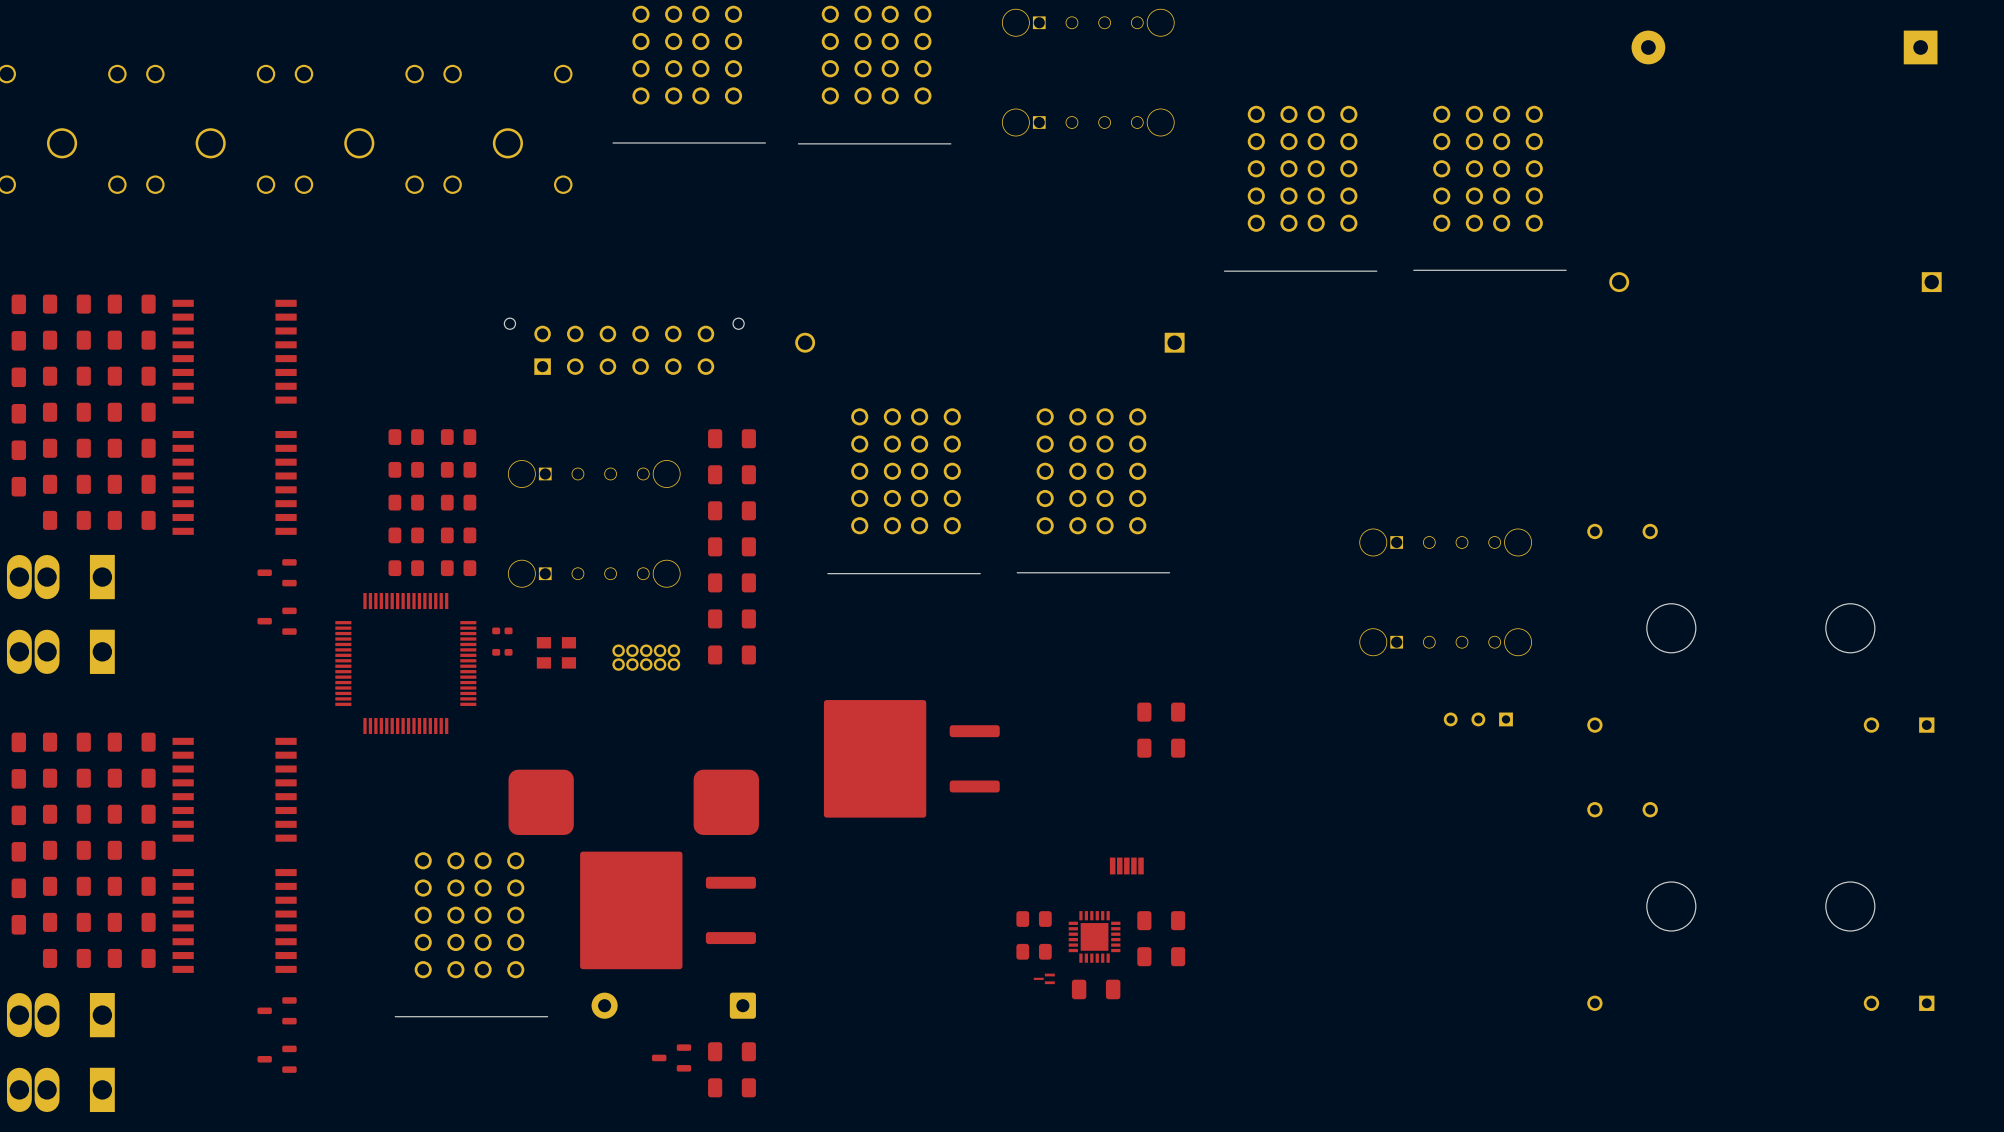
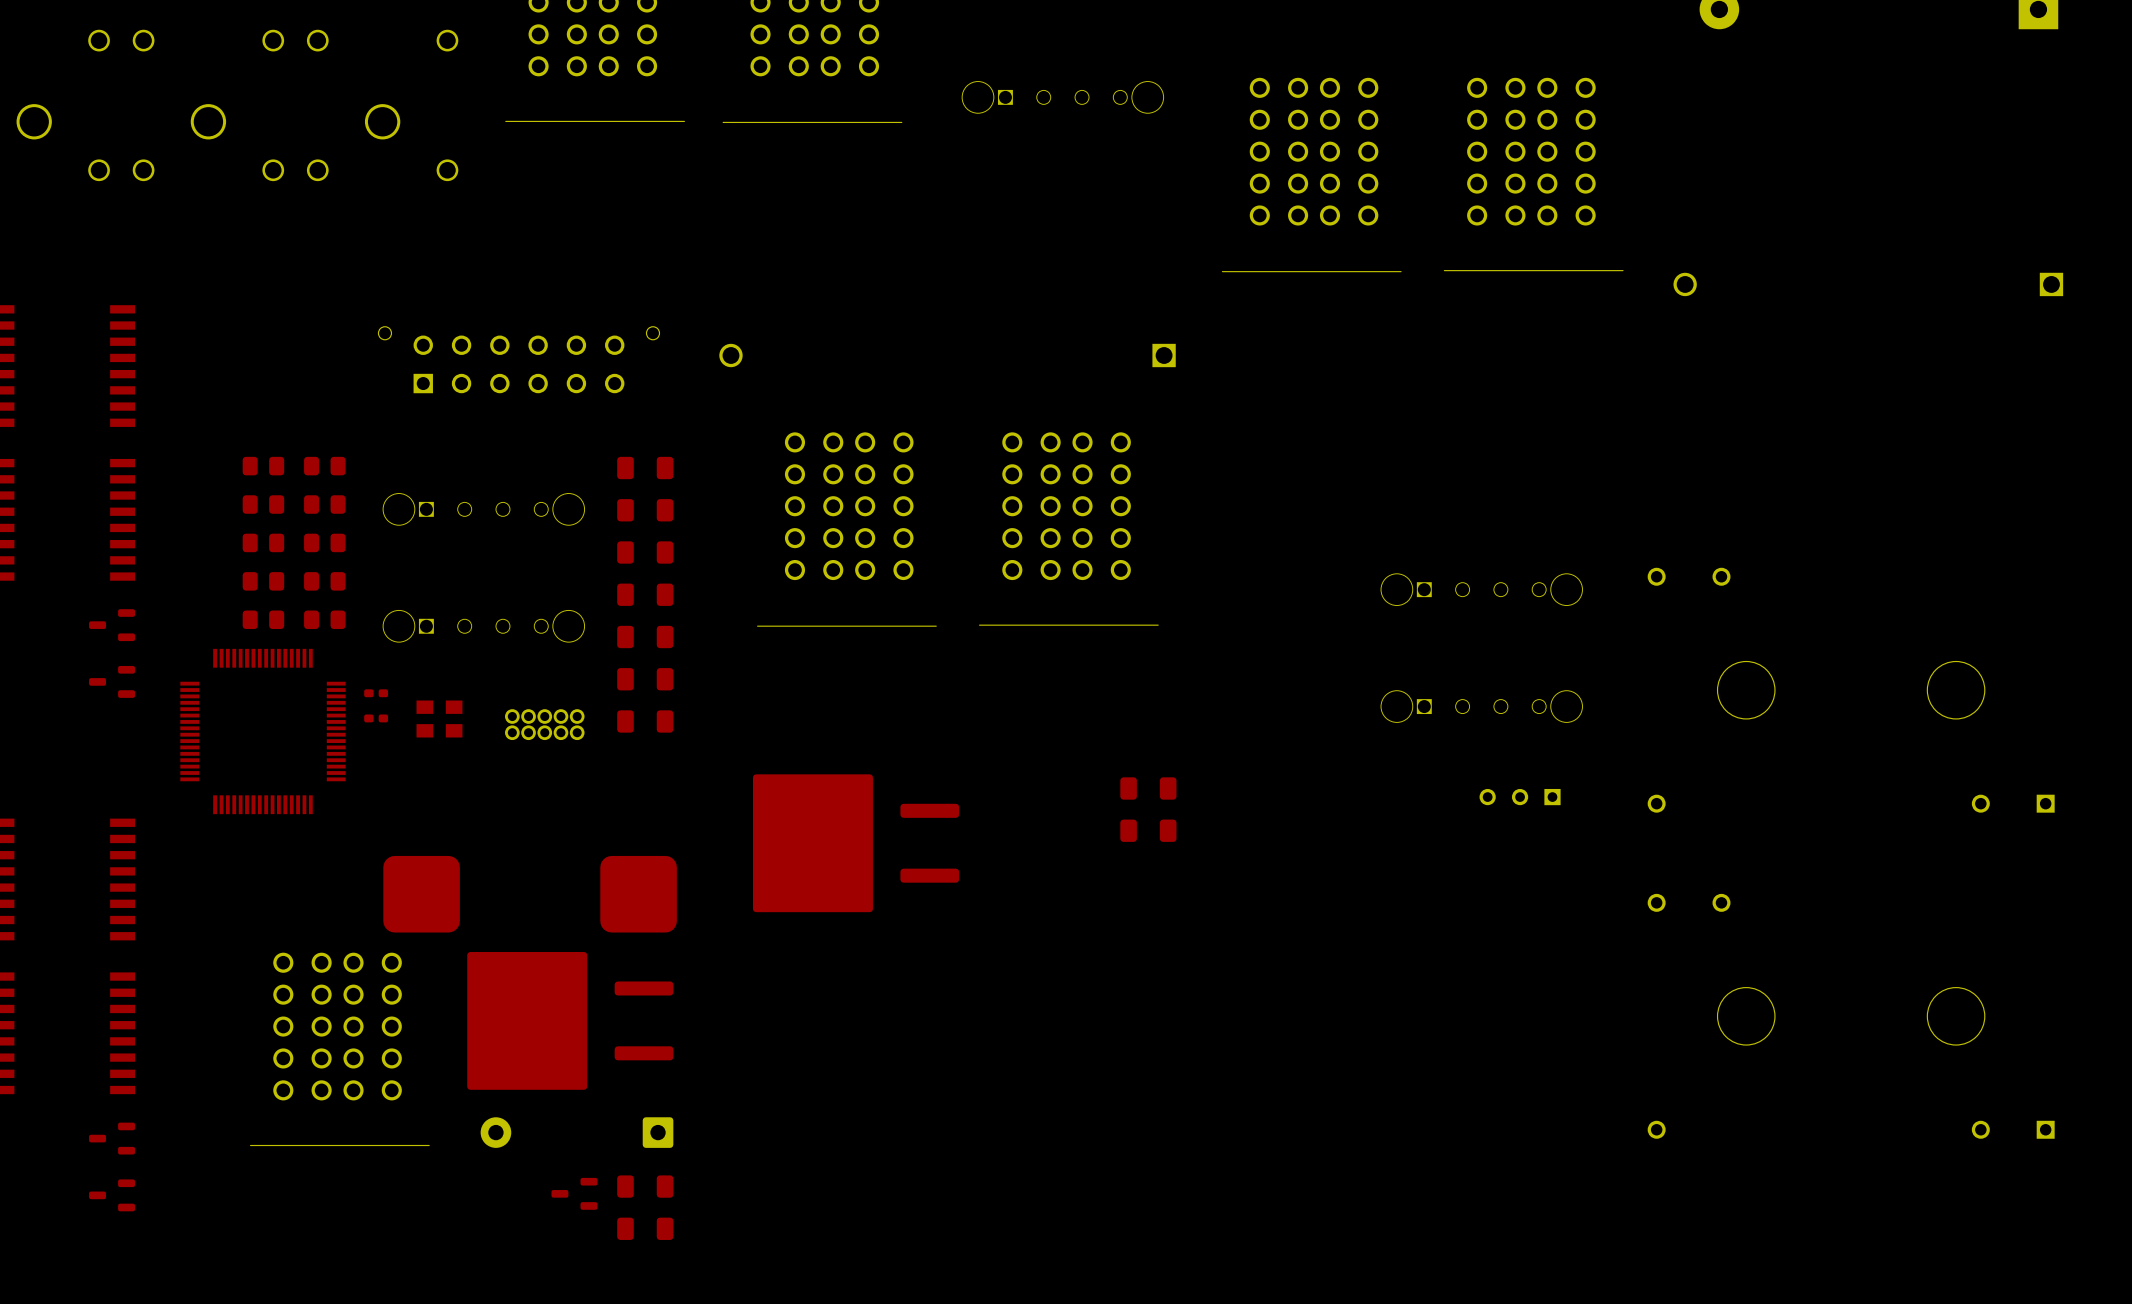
part: (1126, 873) -> none
part: (1034, 919) -> none
part: (1161, 920) -> none
part: (1094, 936) -> none
part: (1034, 951) -> none
part: (1161, 956) -> none
part: (1044, 978) -> none
part: (1096, 989) -> none

